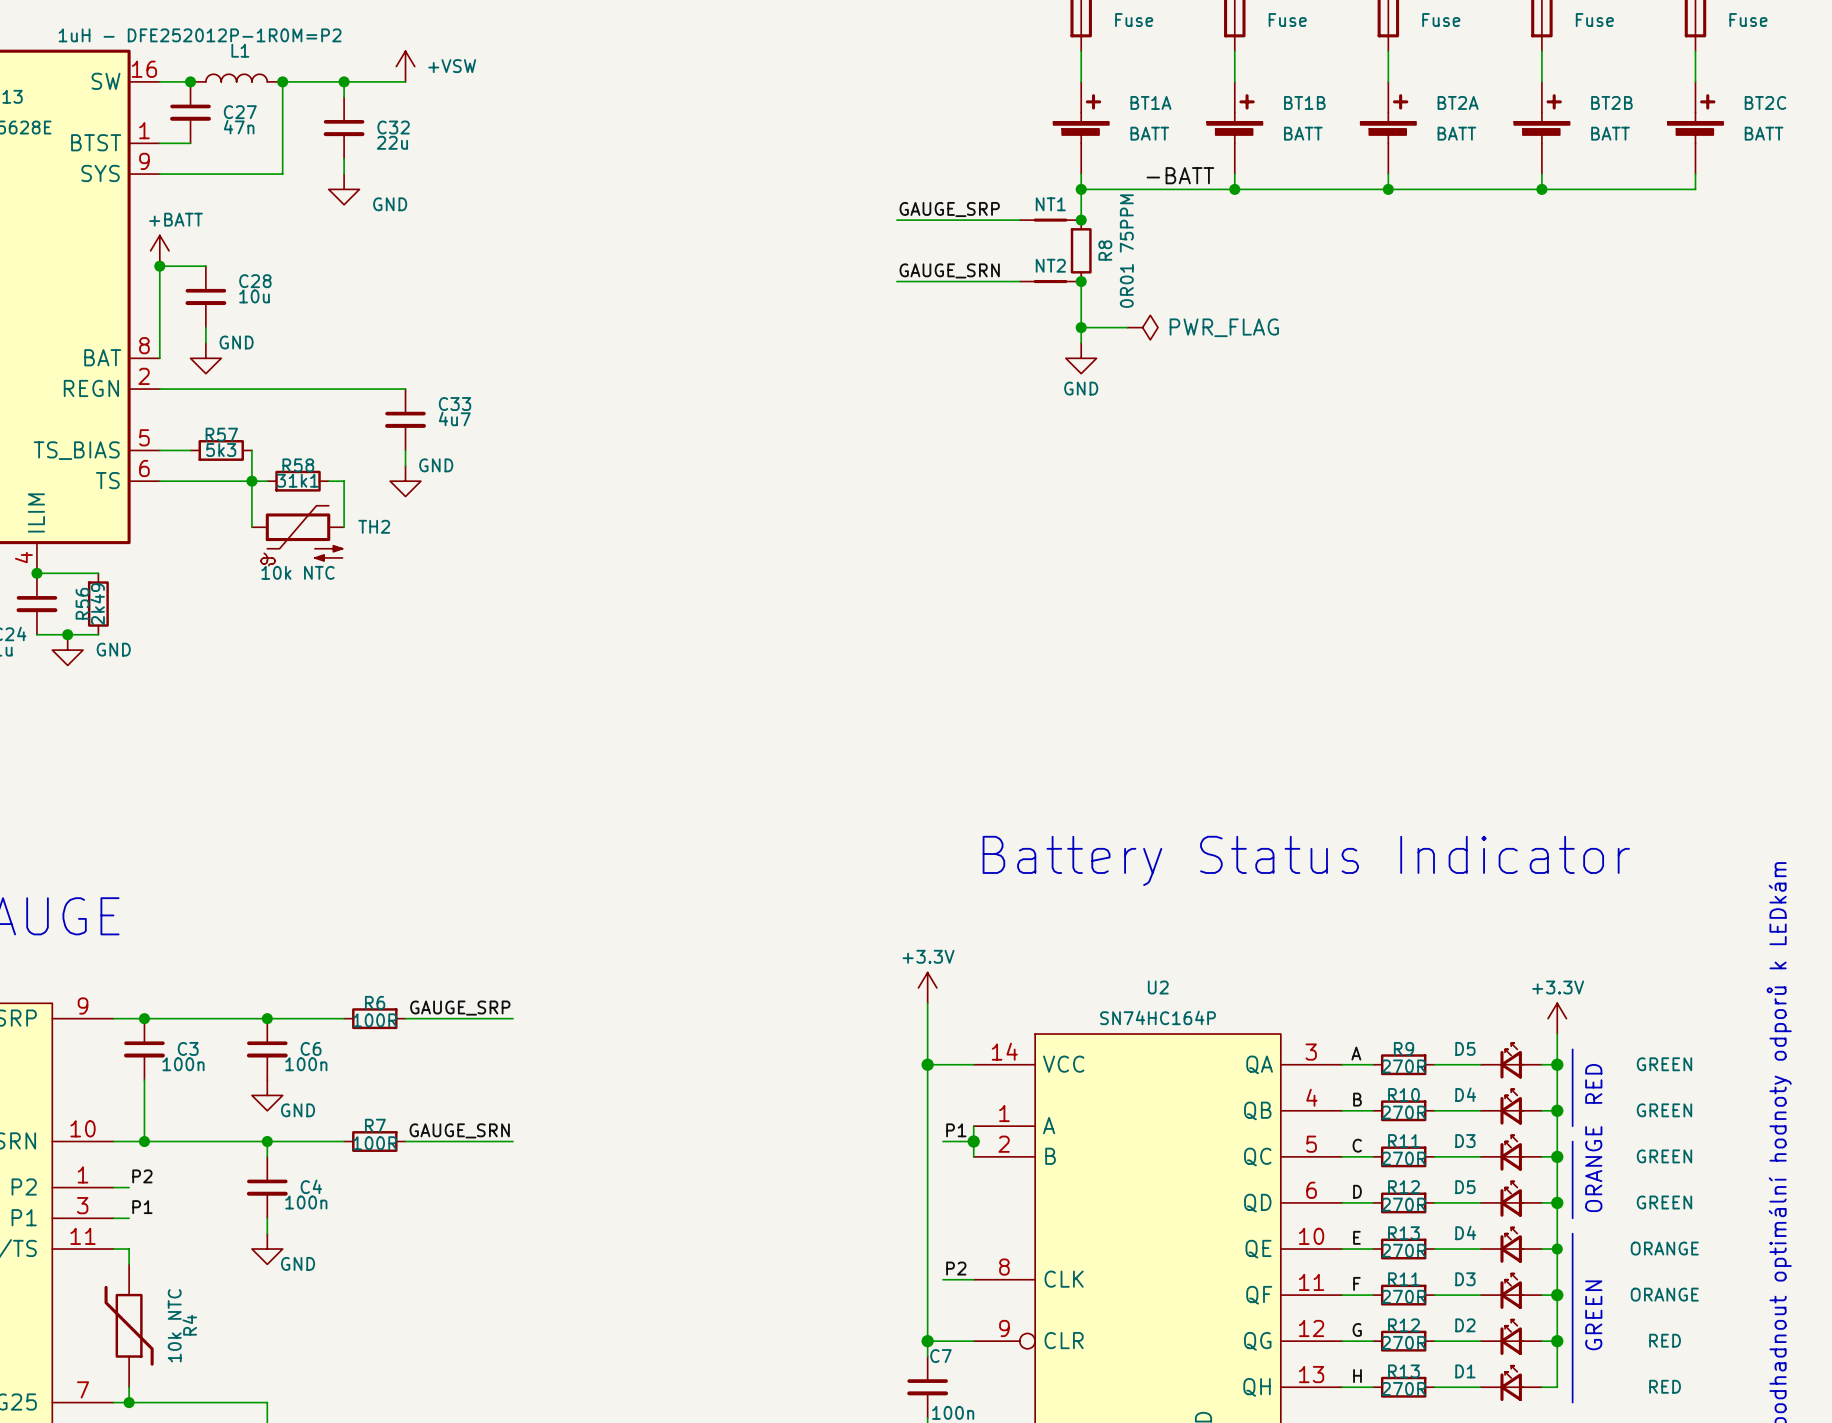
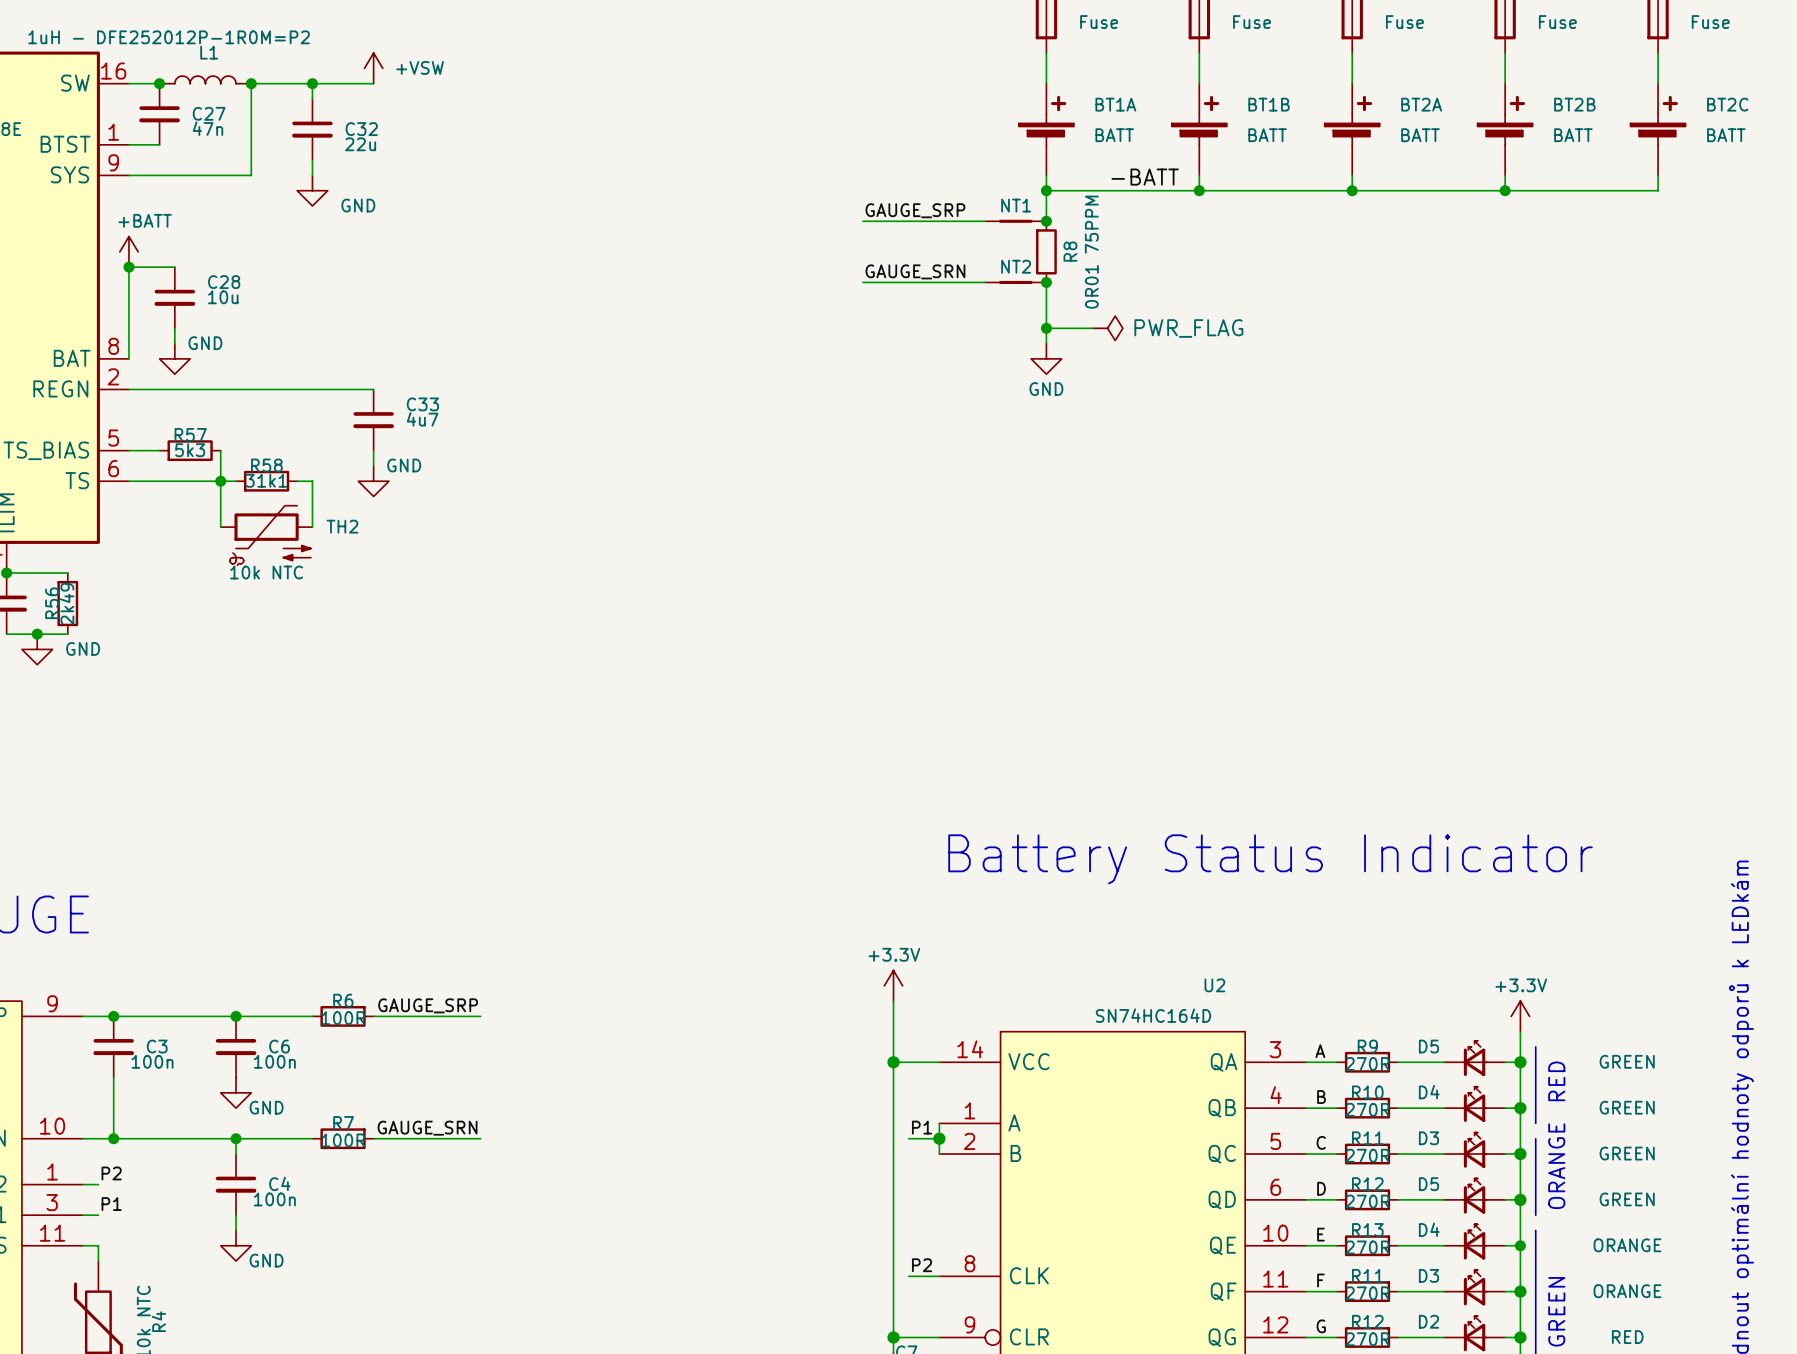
U2 name position: U2 (1158, 987) -> U2 (1214, 985)
U2 value: SN74HC164P (1158, 1017) -> SN74HC164D (1153, 1015)

